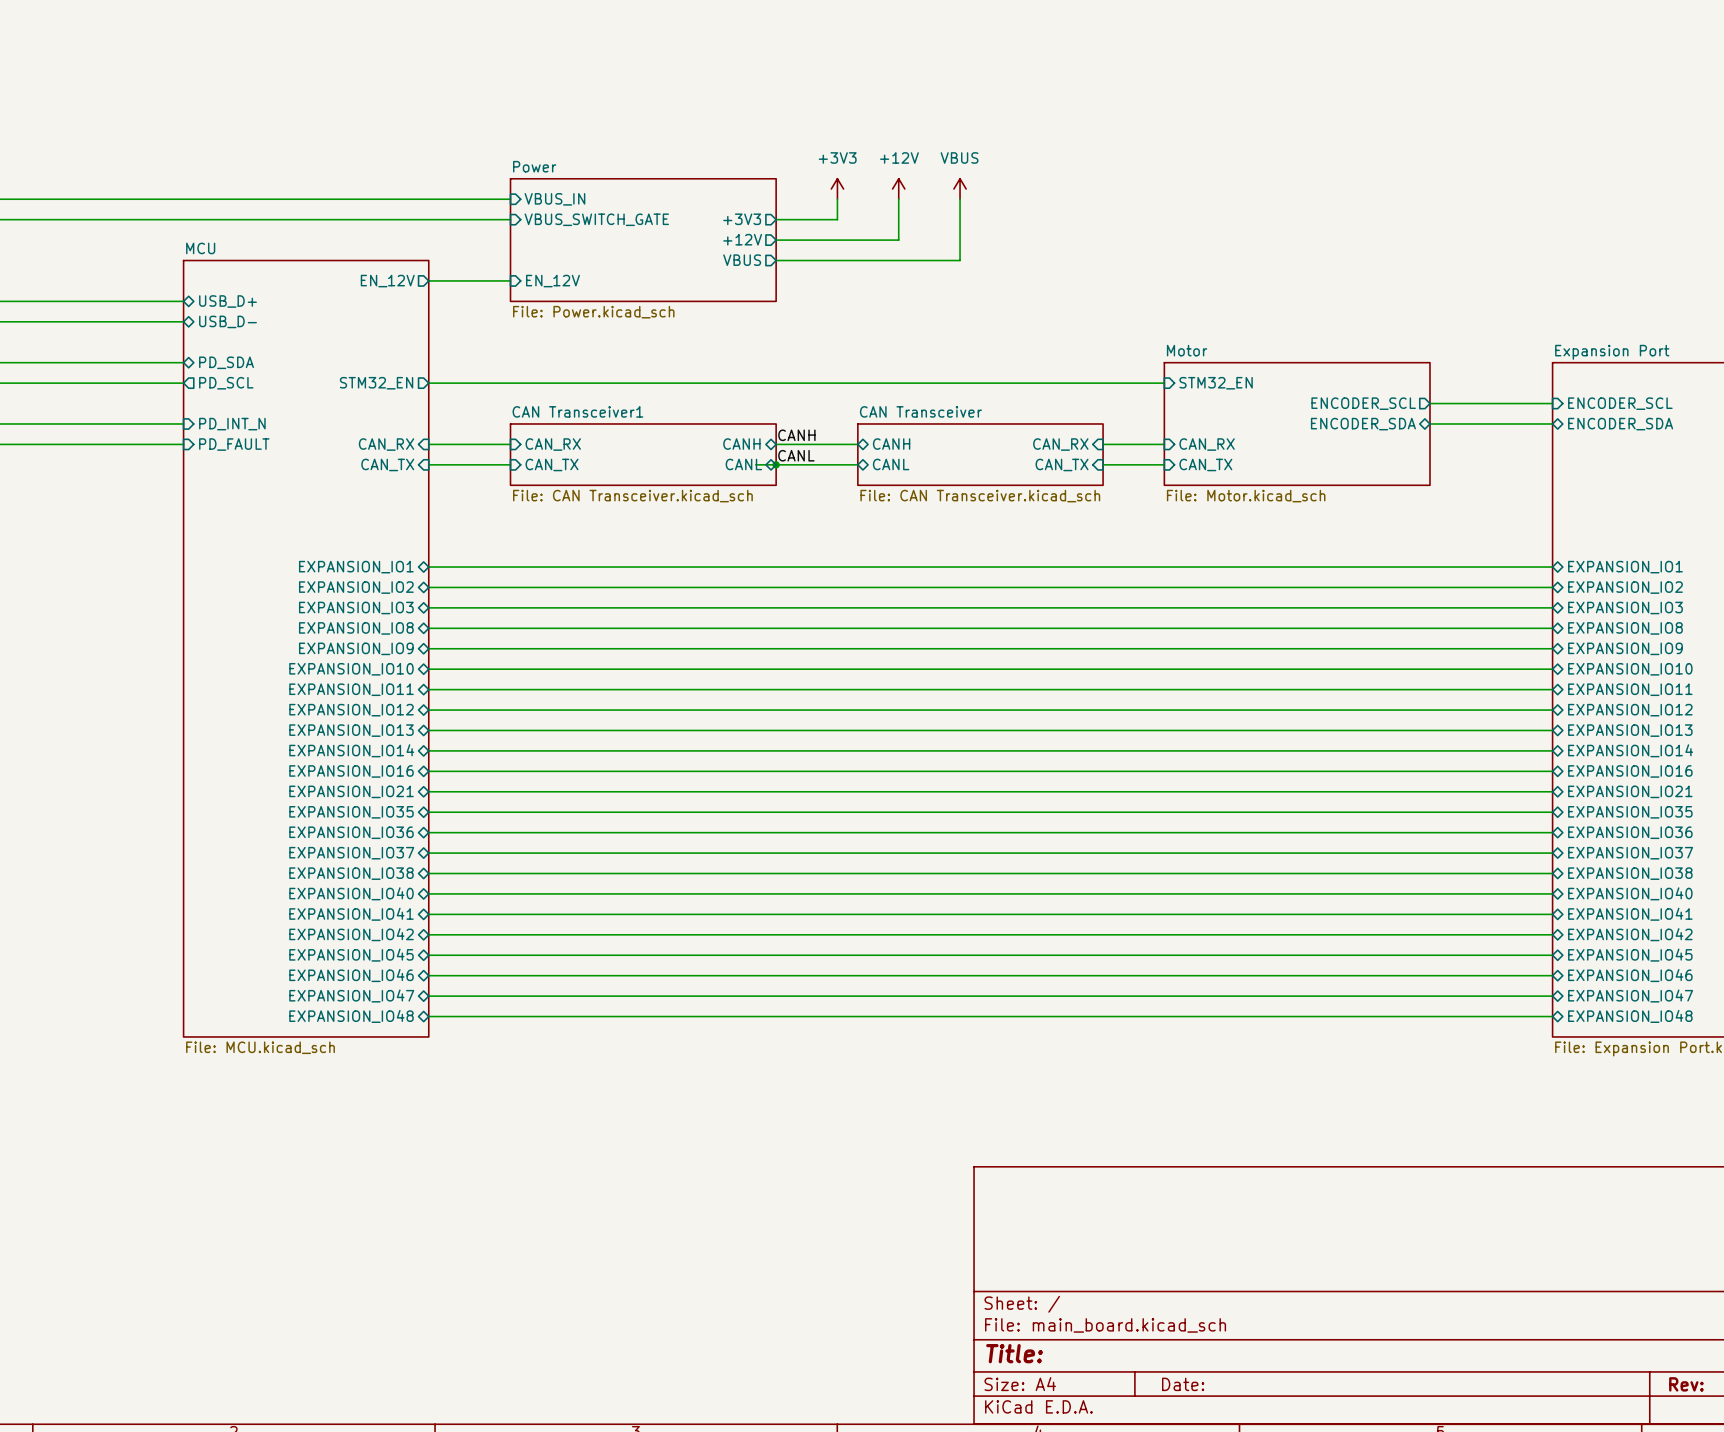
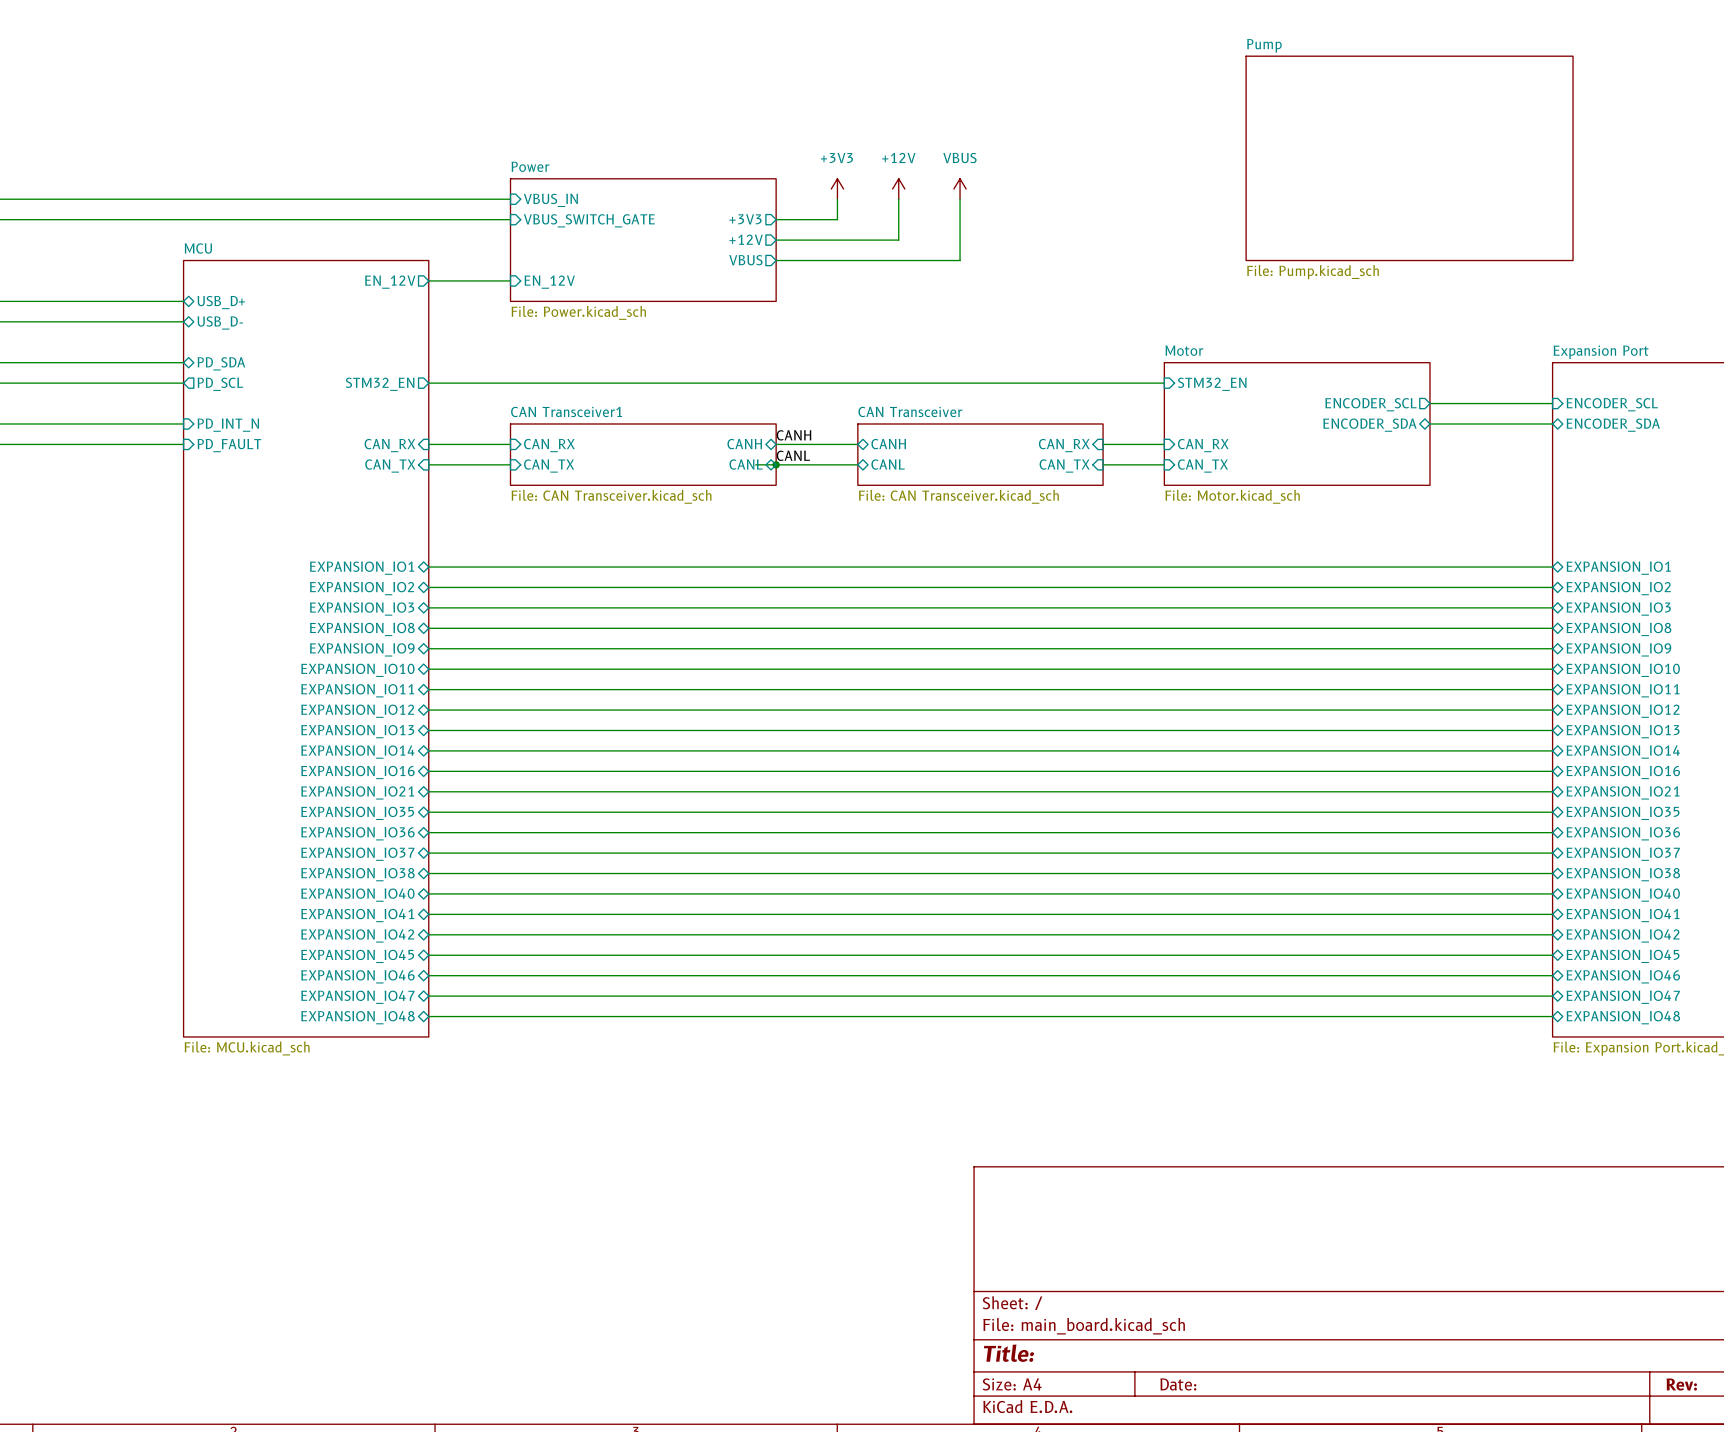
sheet Pump: none -> File: Pump.kicad_sch (1409, 158)

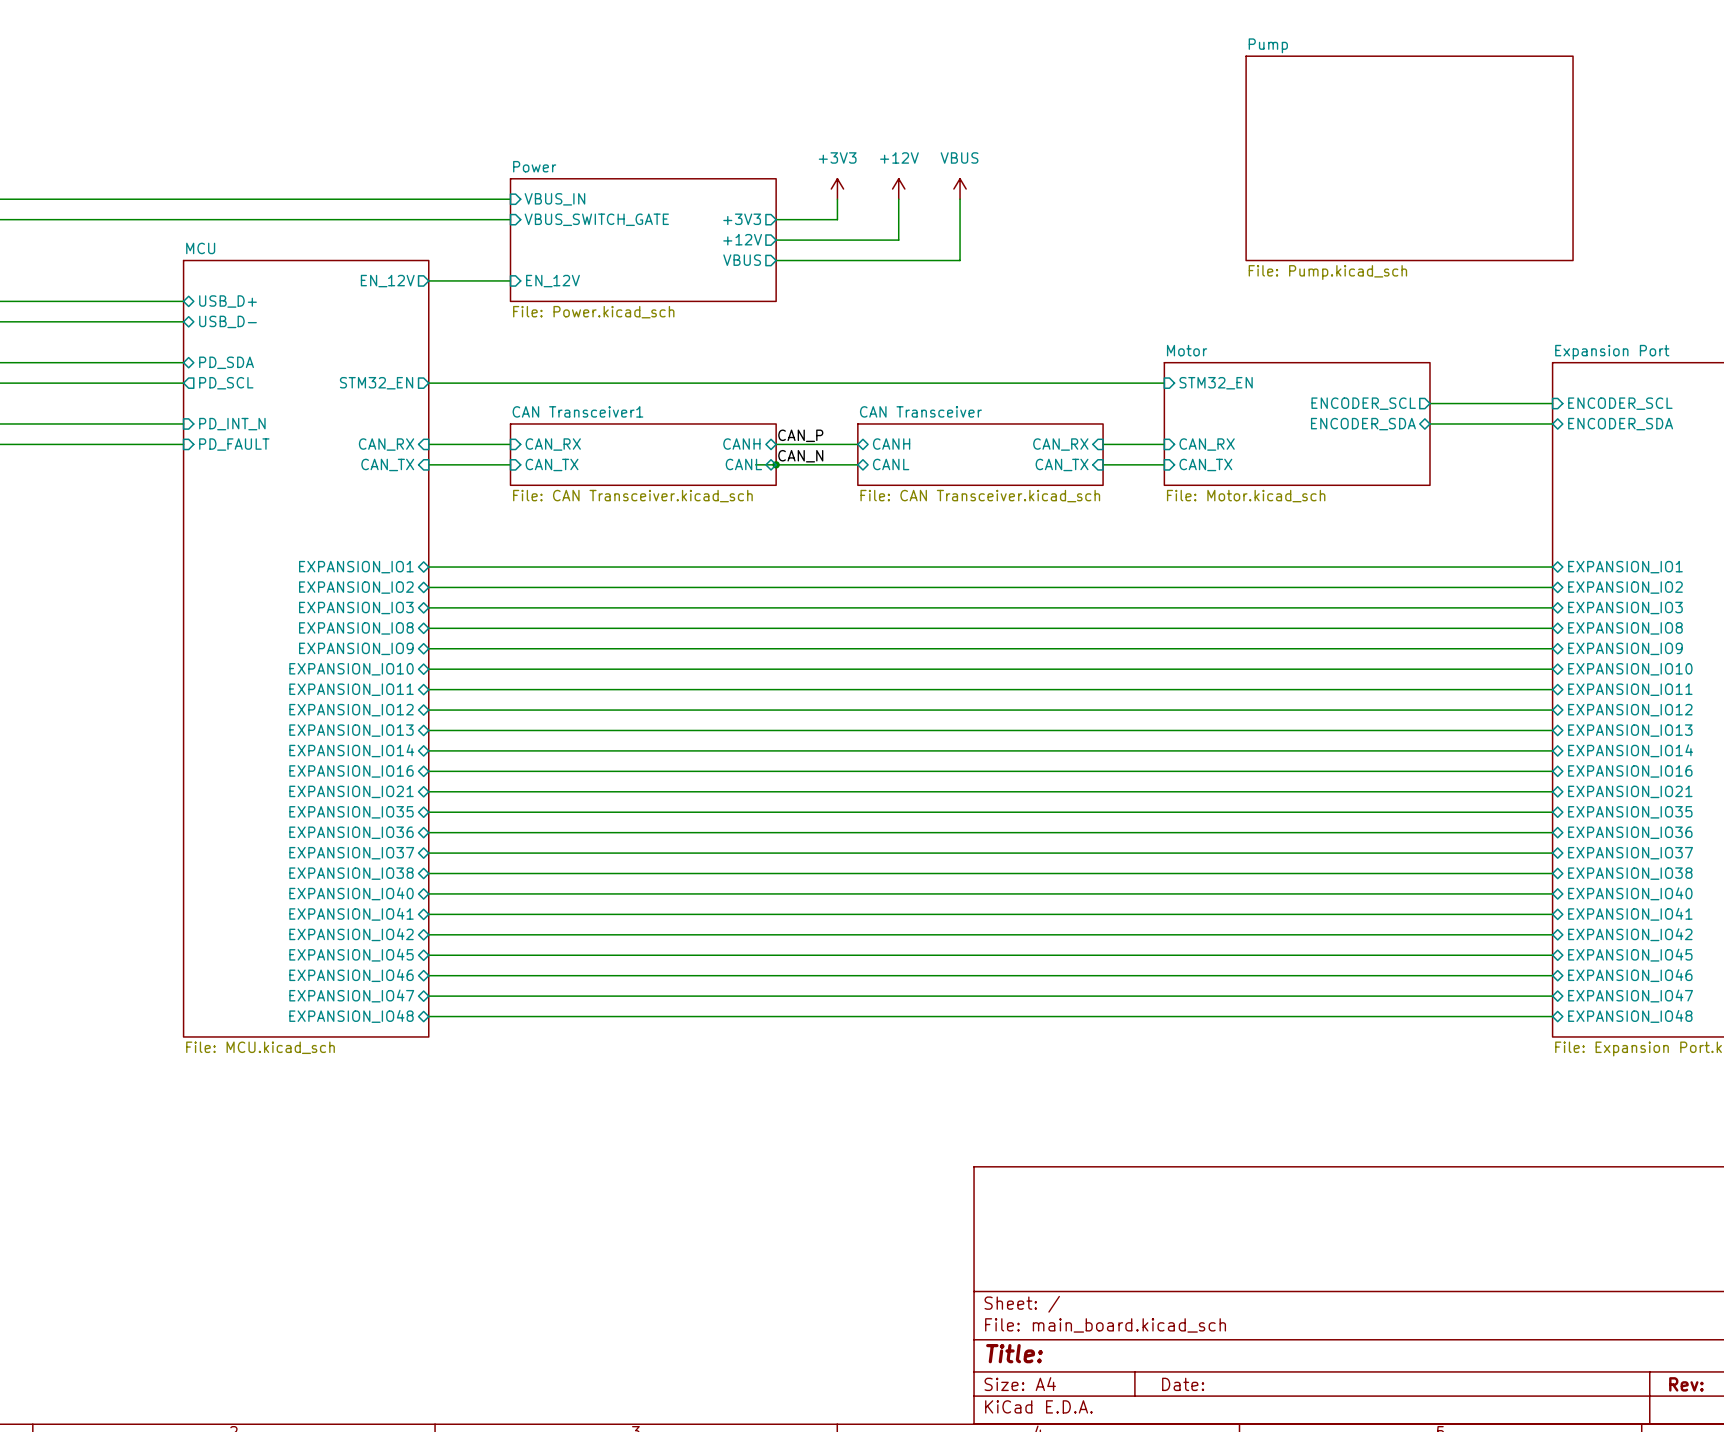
label: CANH (793, 435) -> CAN_P (800, 435)
label: CANL (793, 455) -> CAN_N (800, 456)

